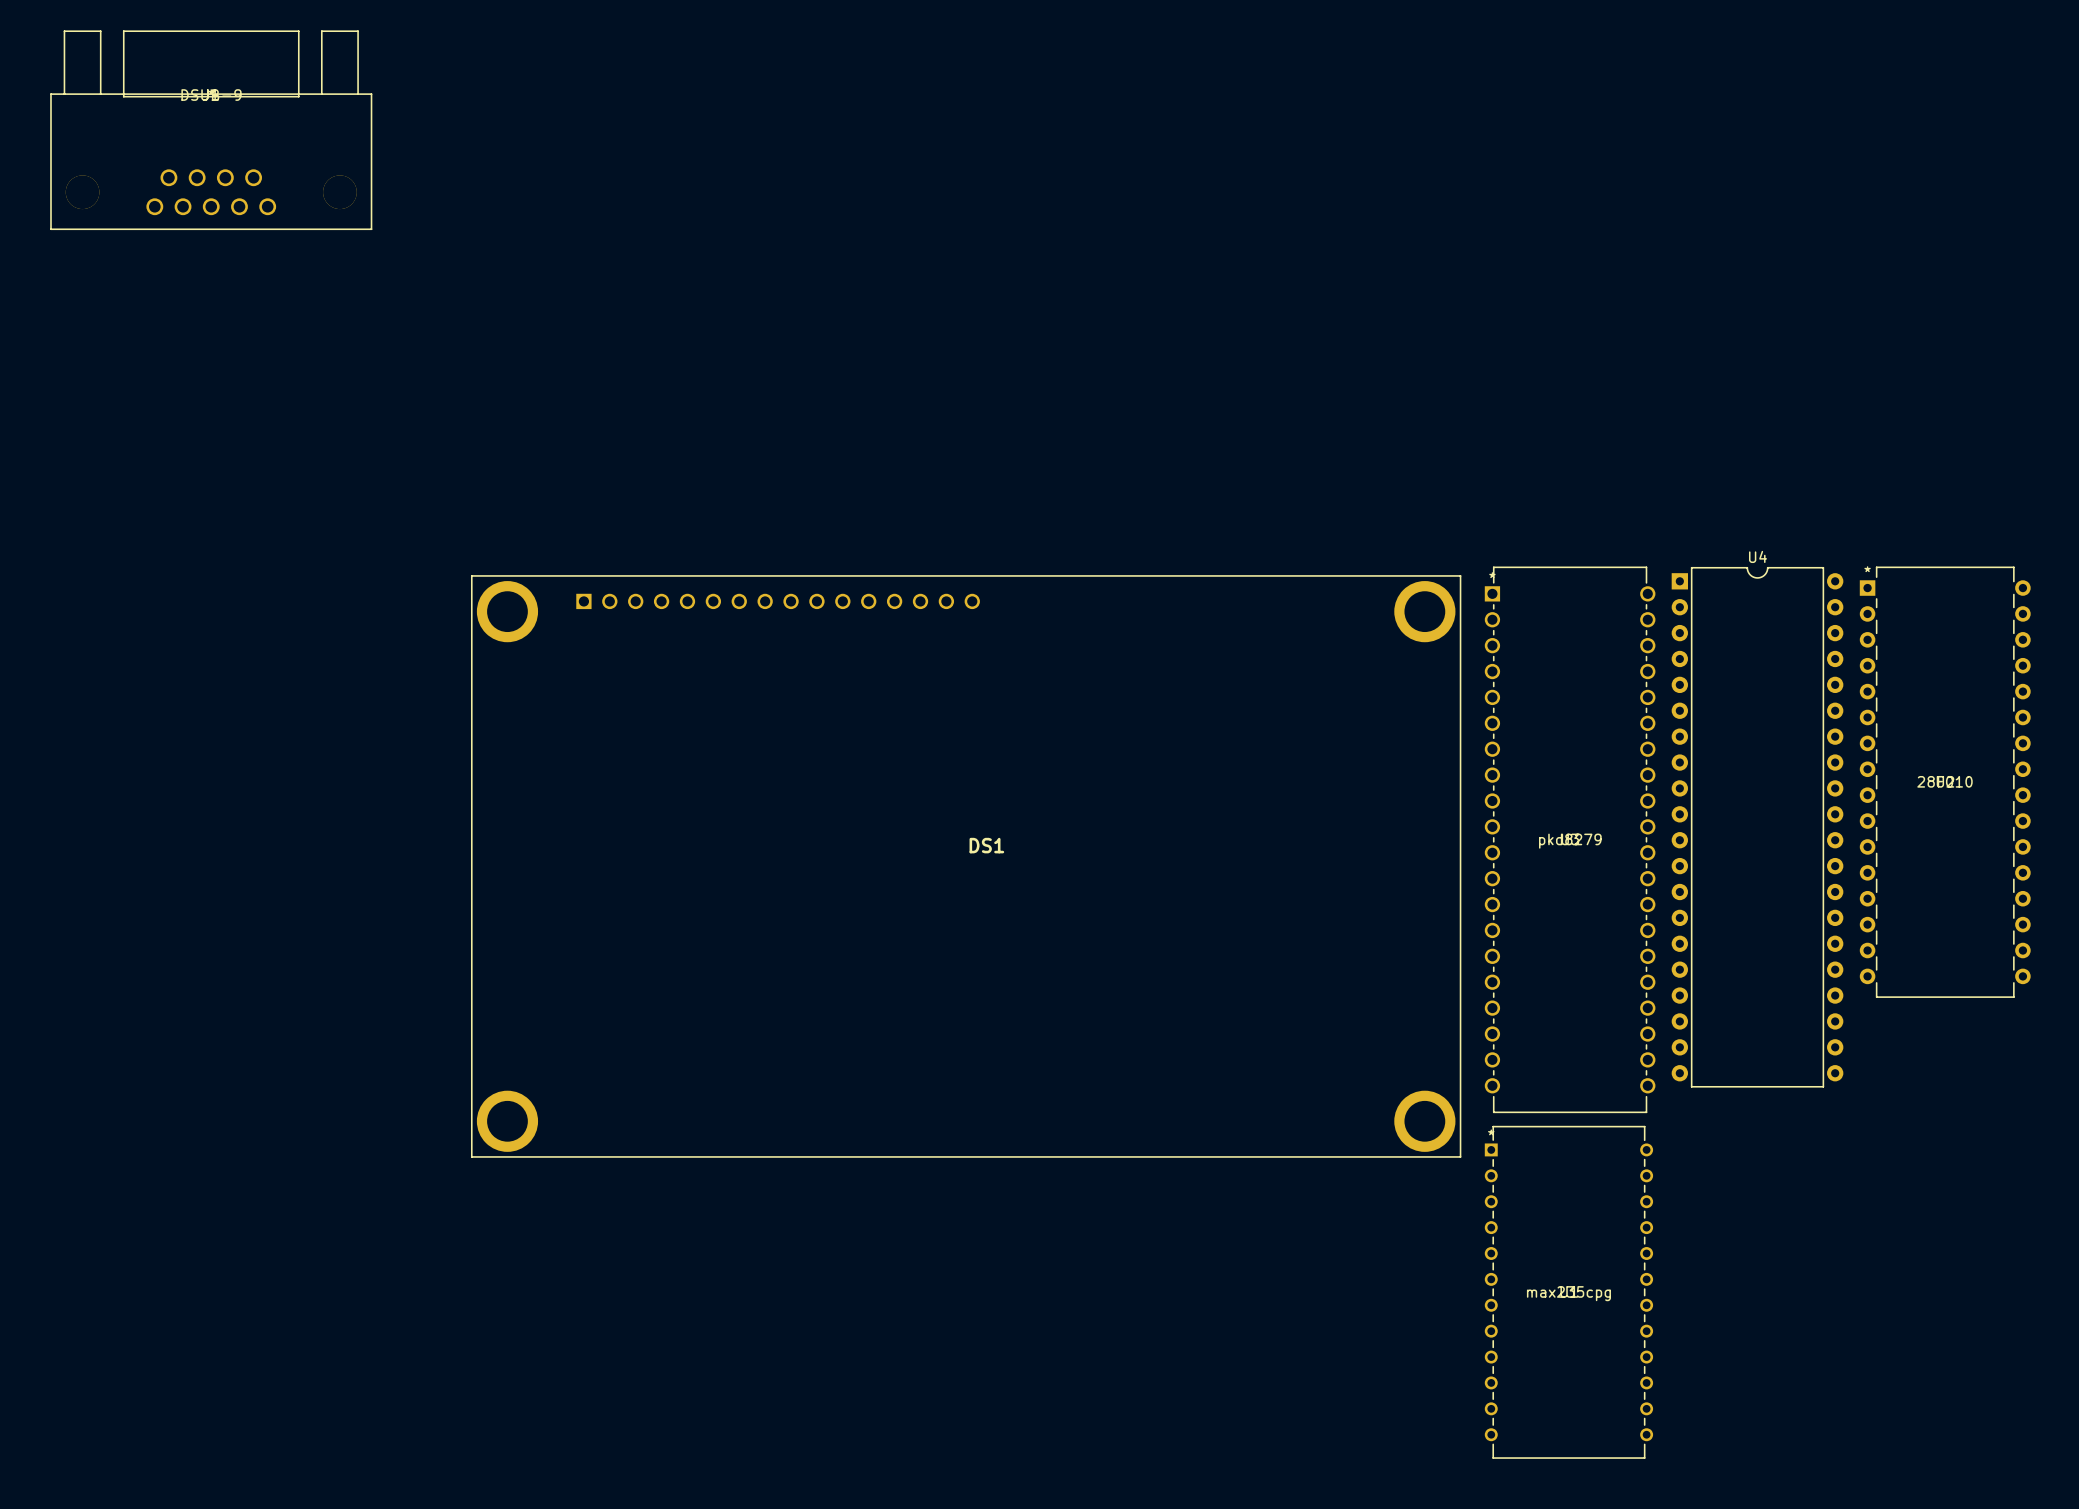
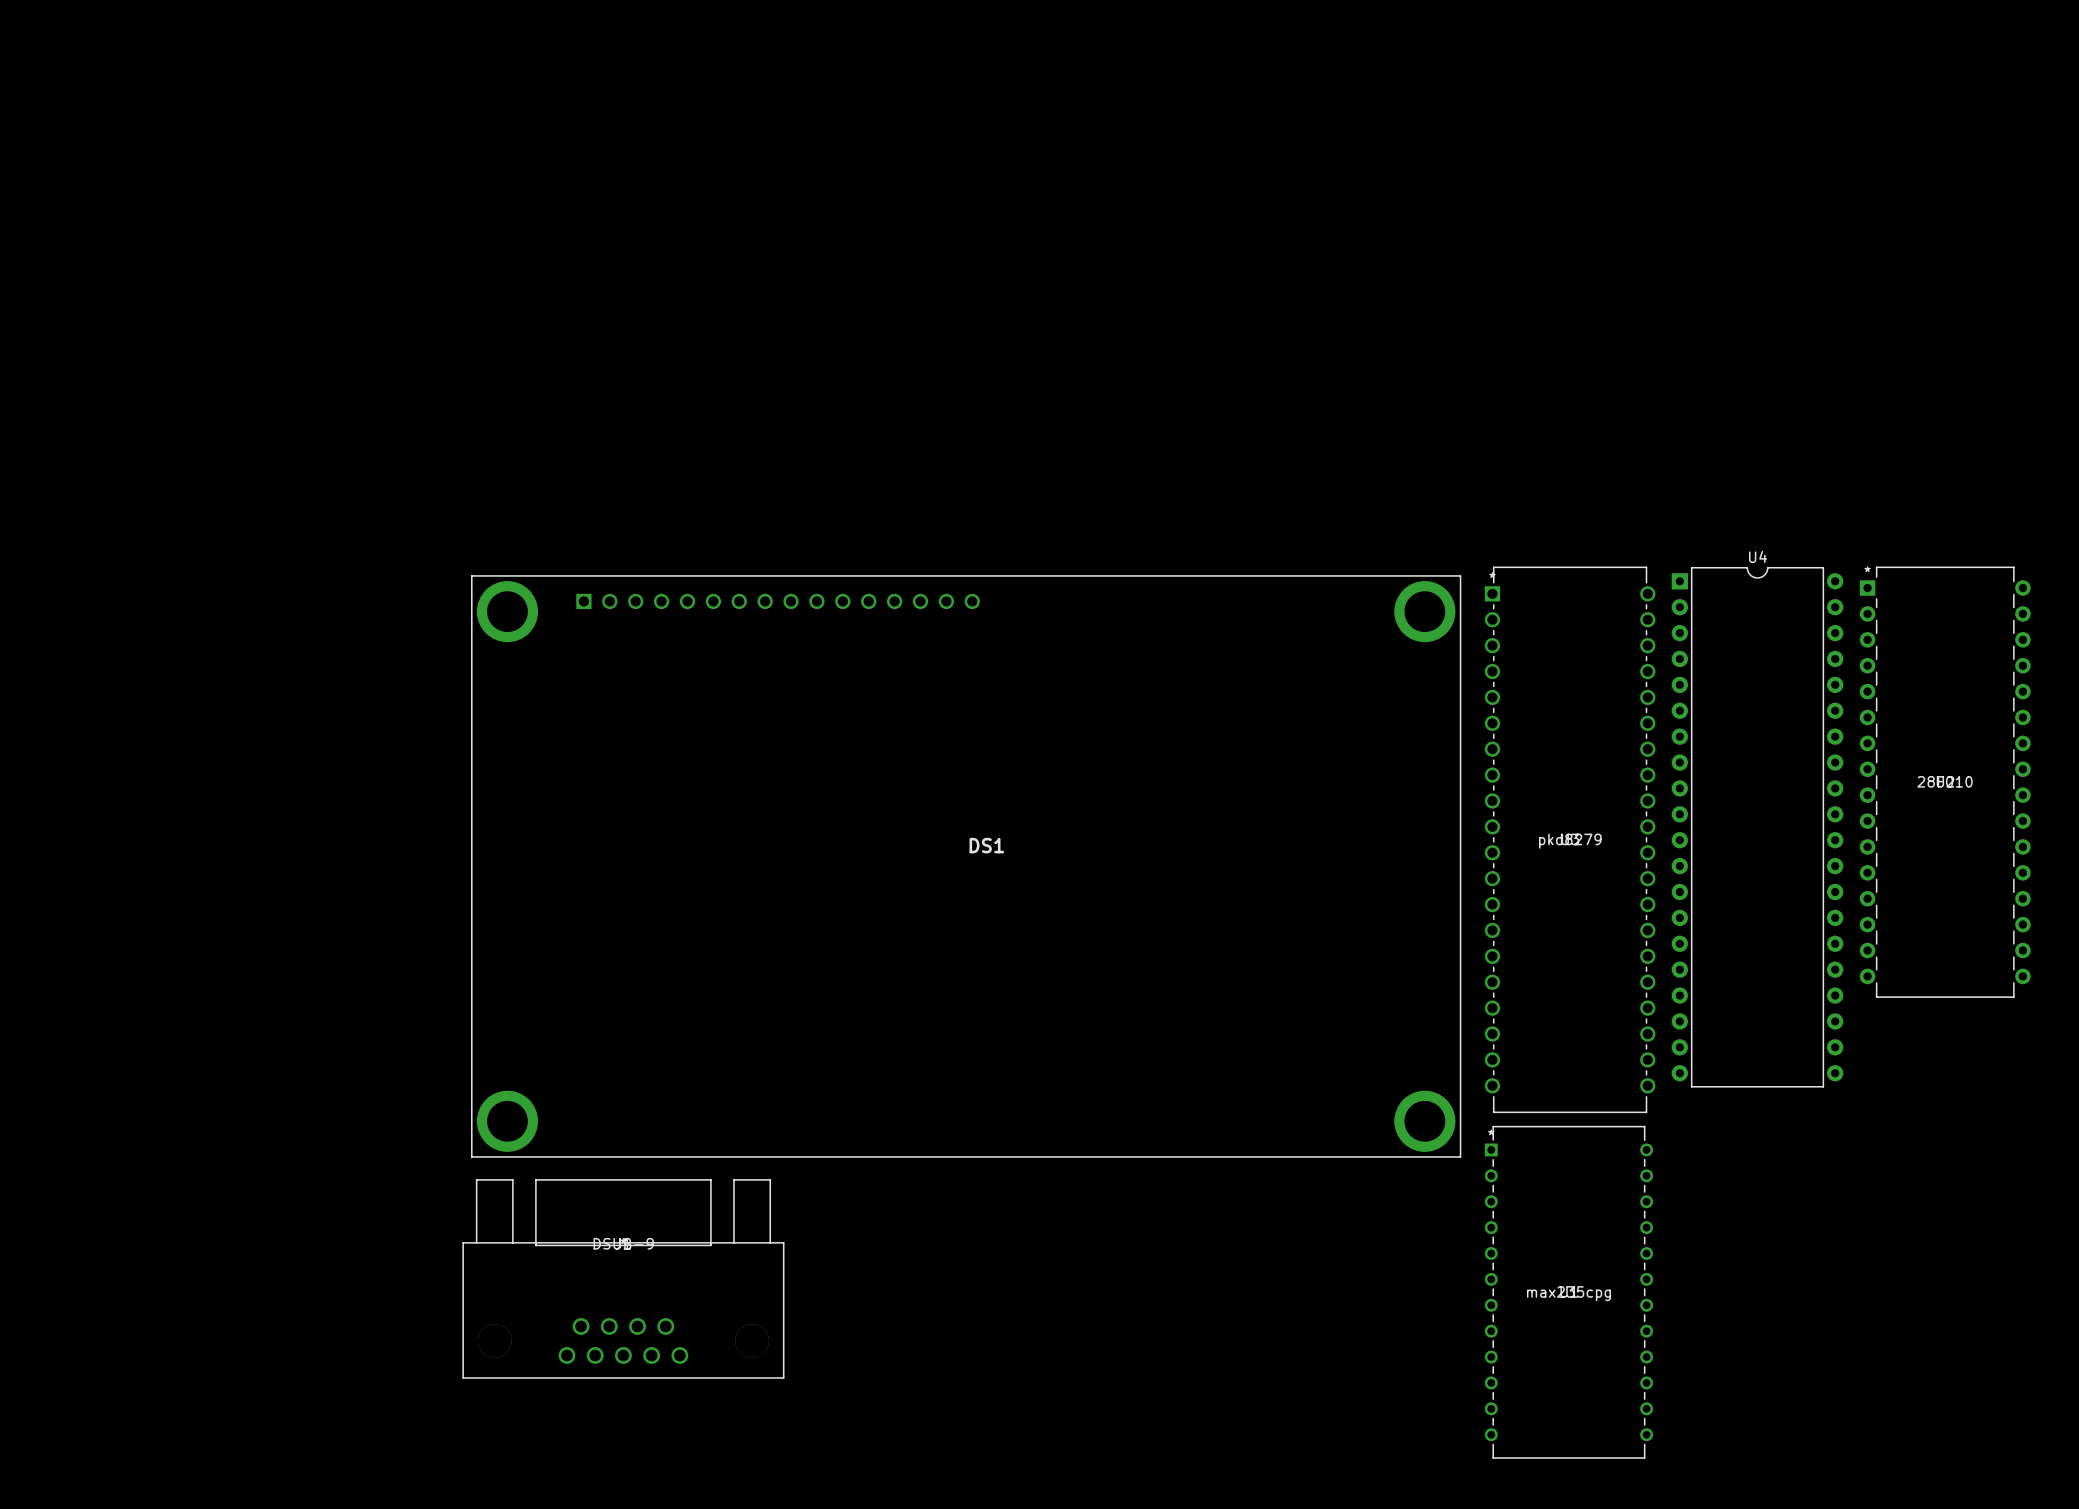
part position: (211, 130) -> (623, 1278)

